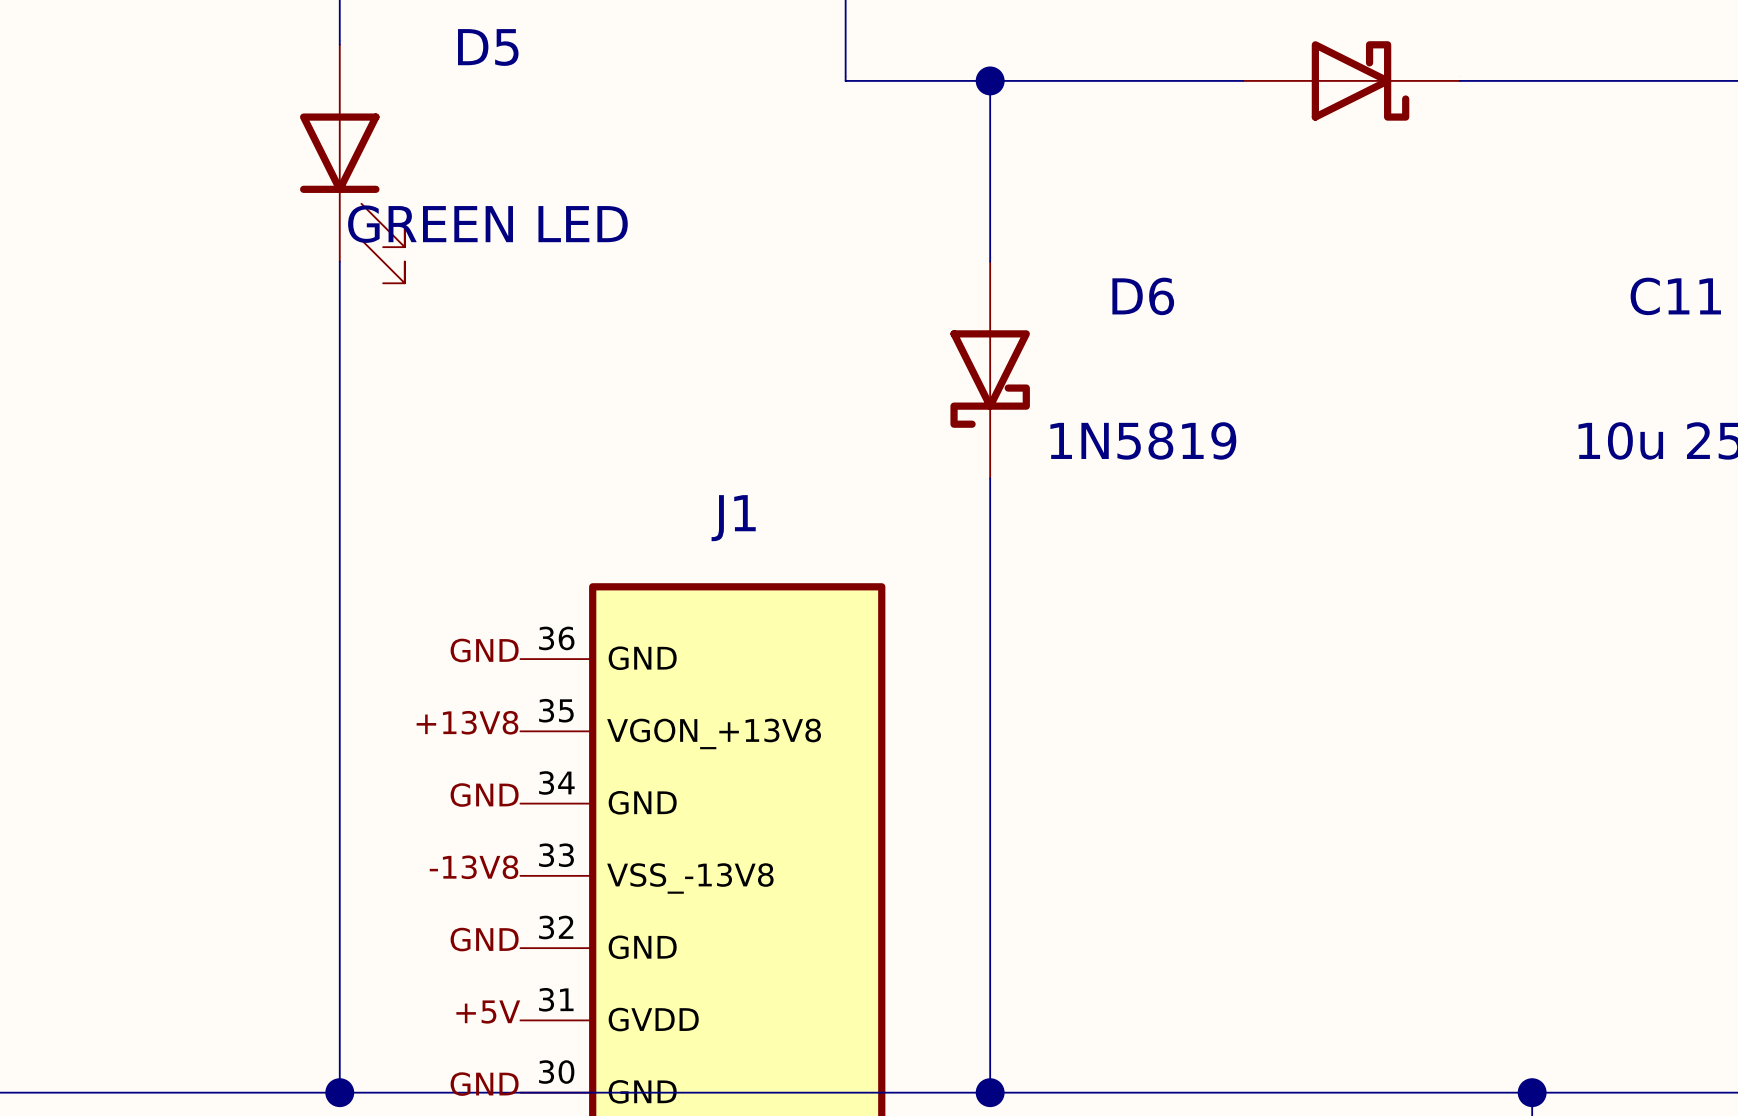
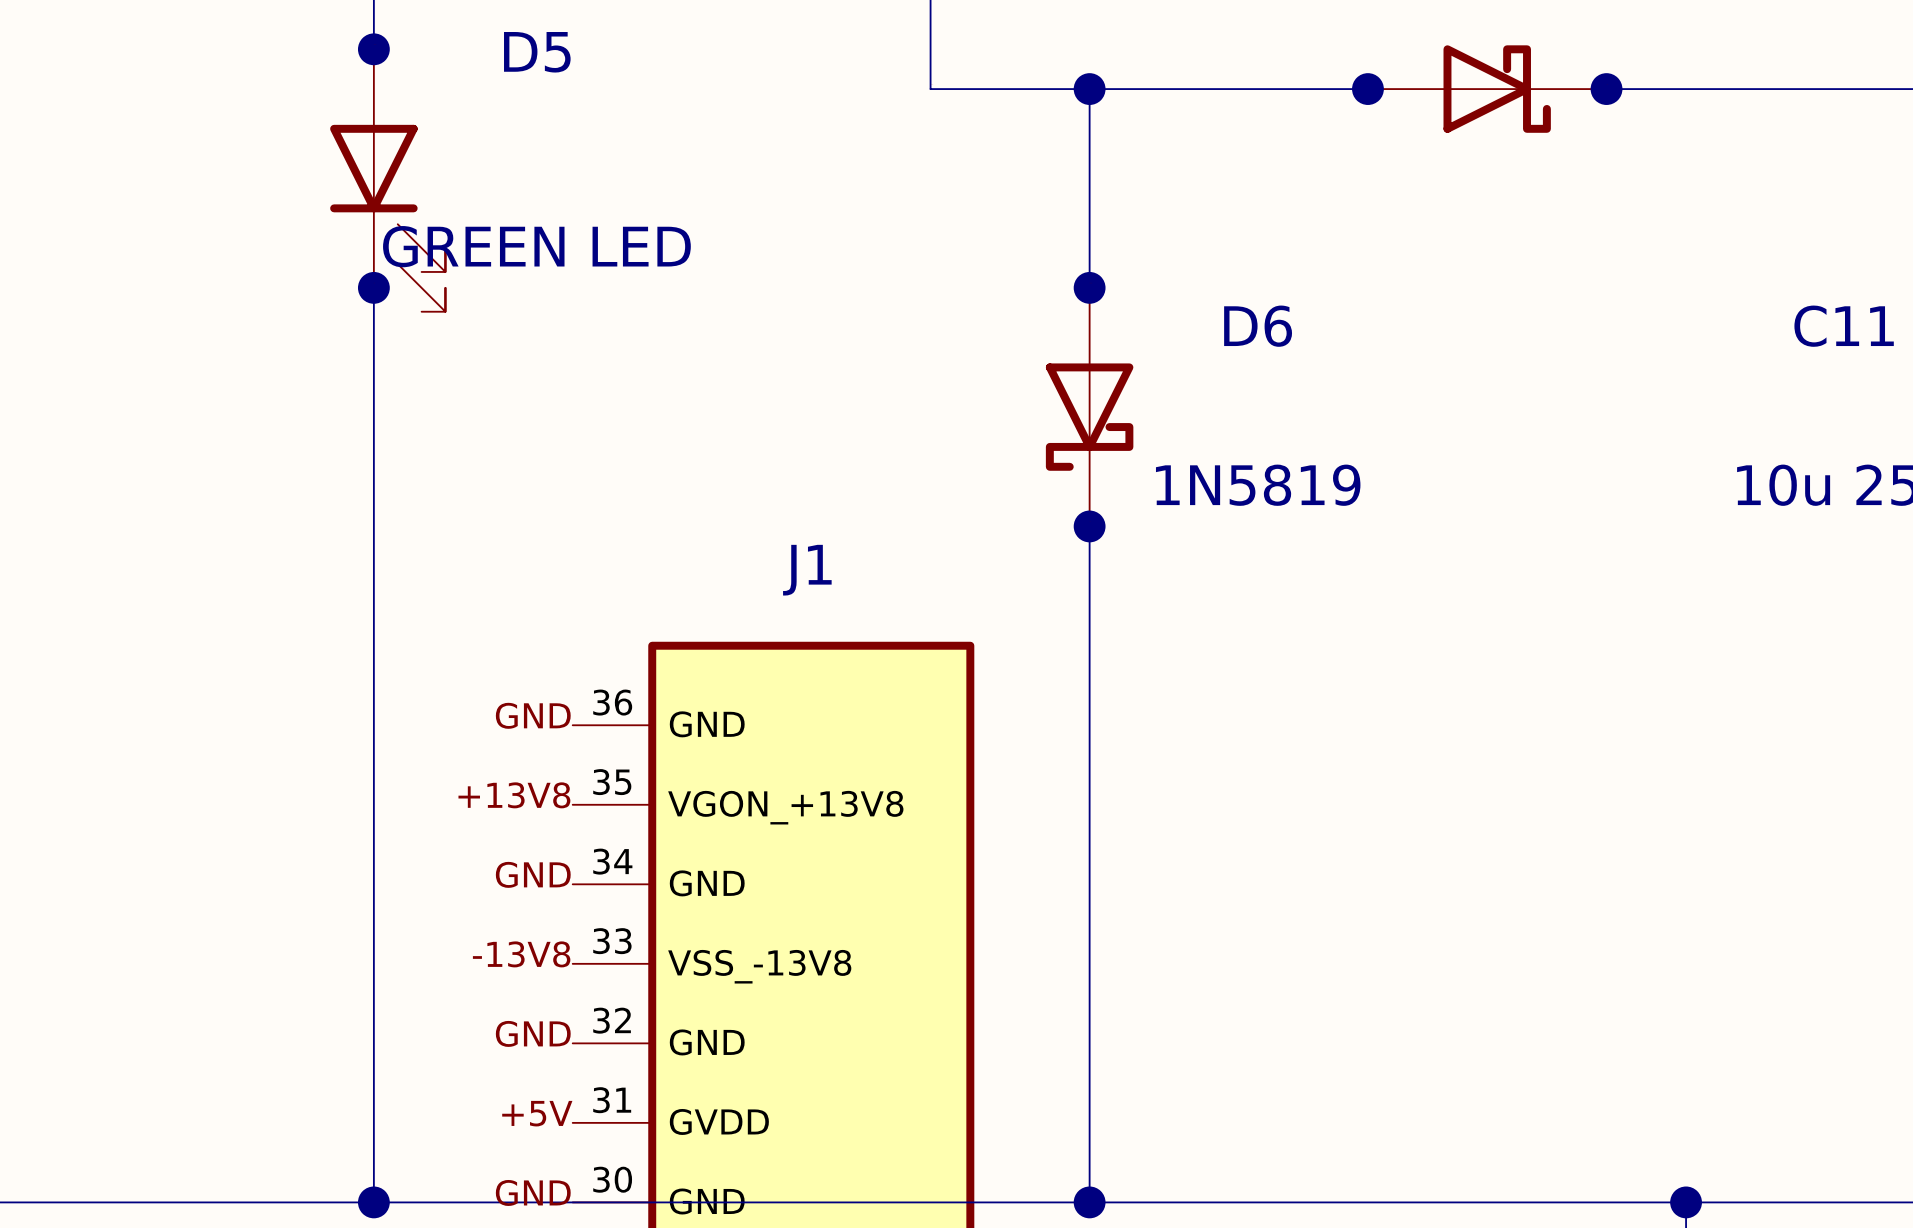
junction: none -> (373, 49)
junction: none -> (1367, 89)
junction: none -> (1606, 89)
junction: none -> (373, 287)
junction: none -> (1089, 287)
junction: none -> (1089, 526)

